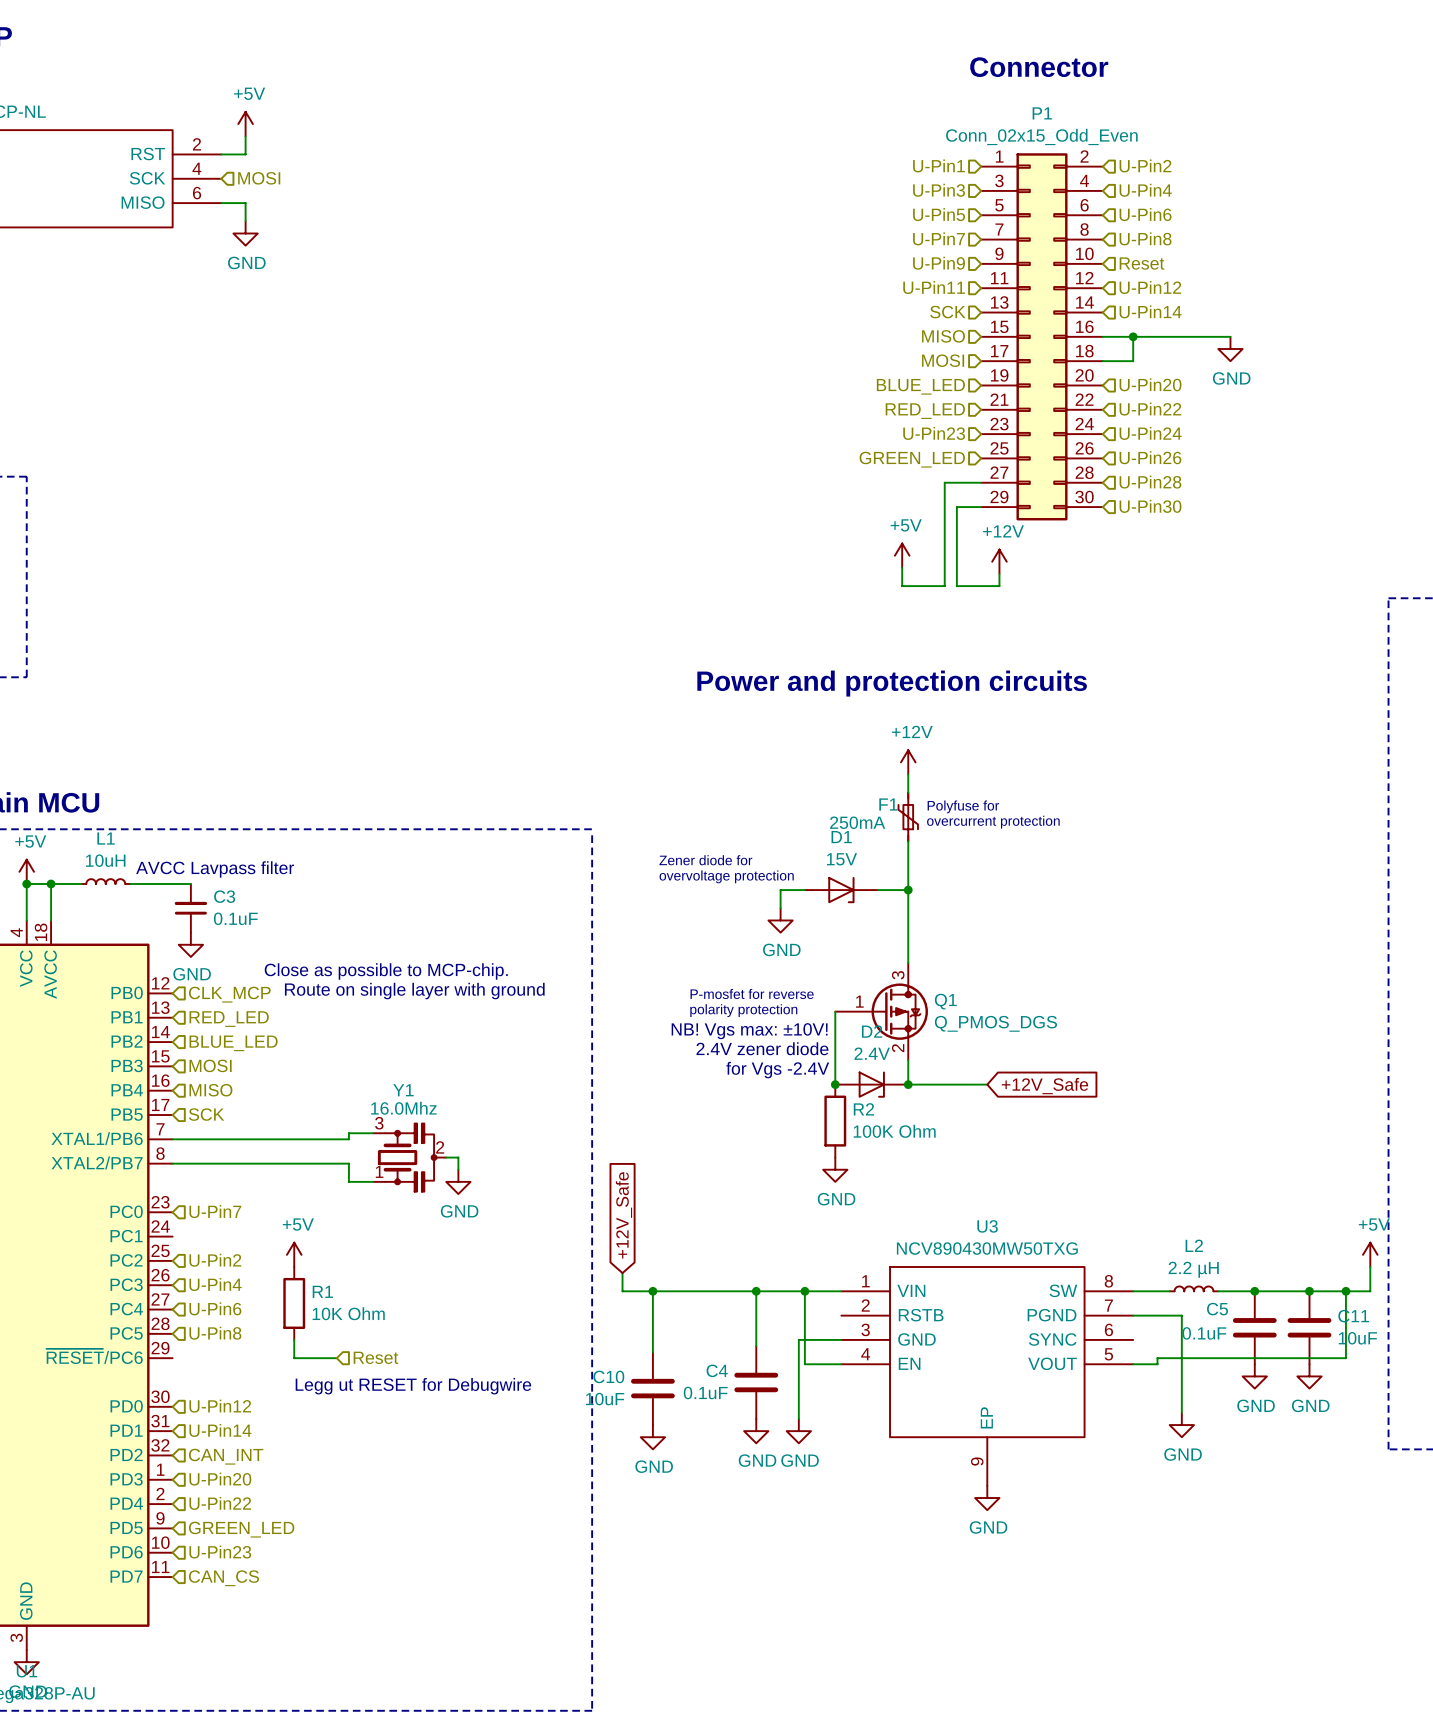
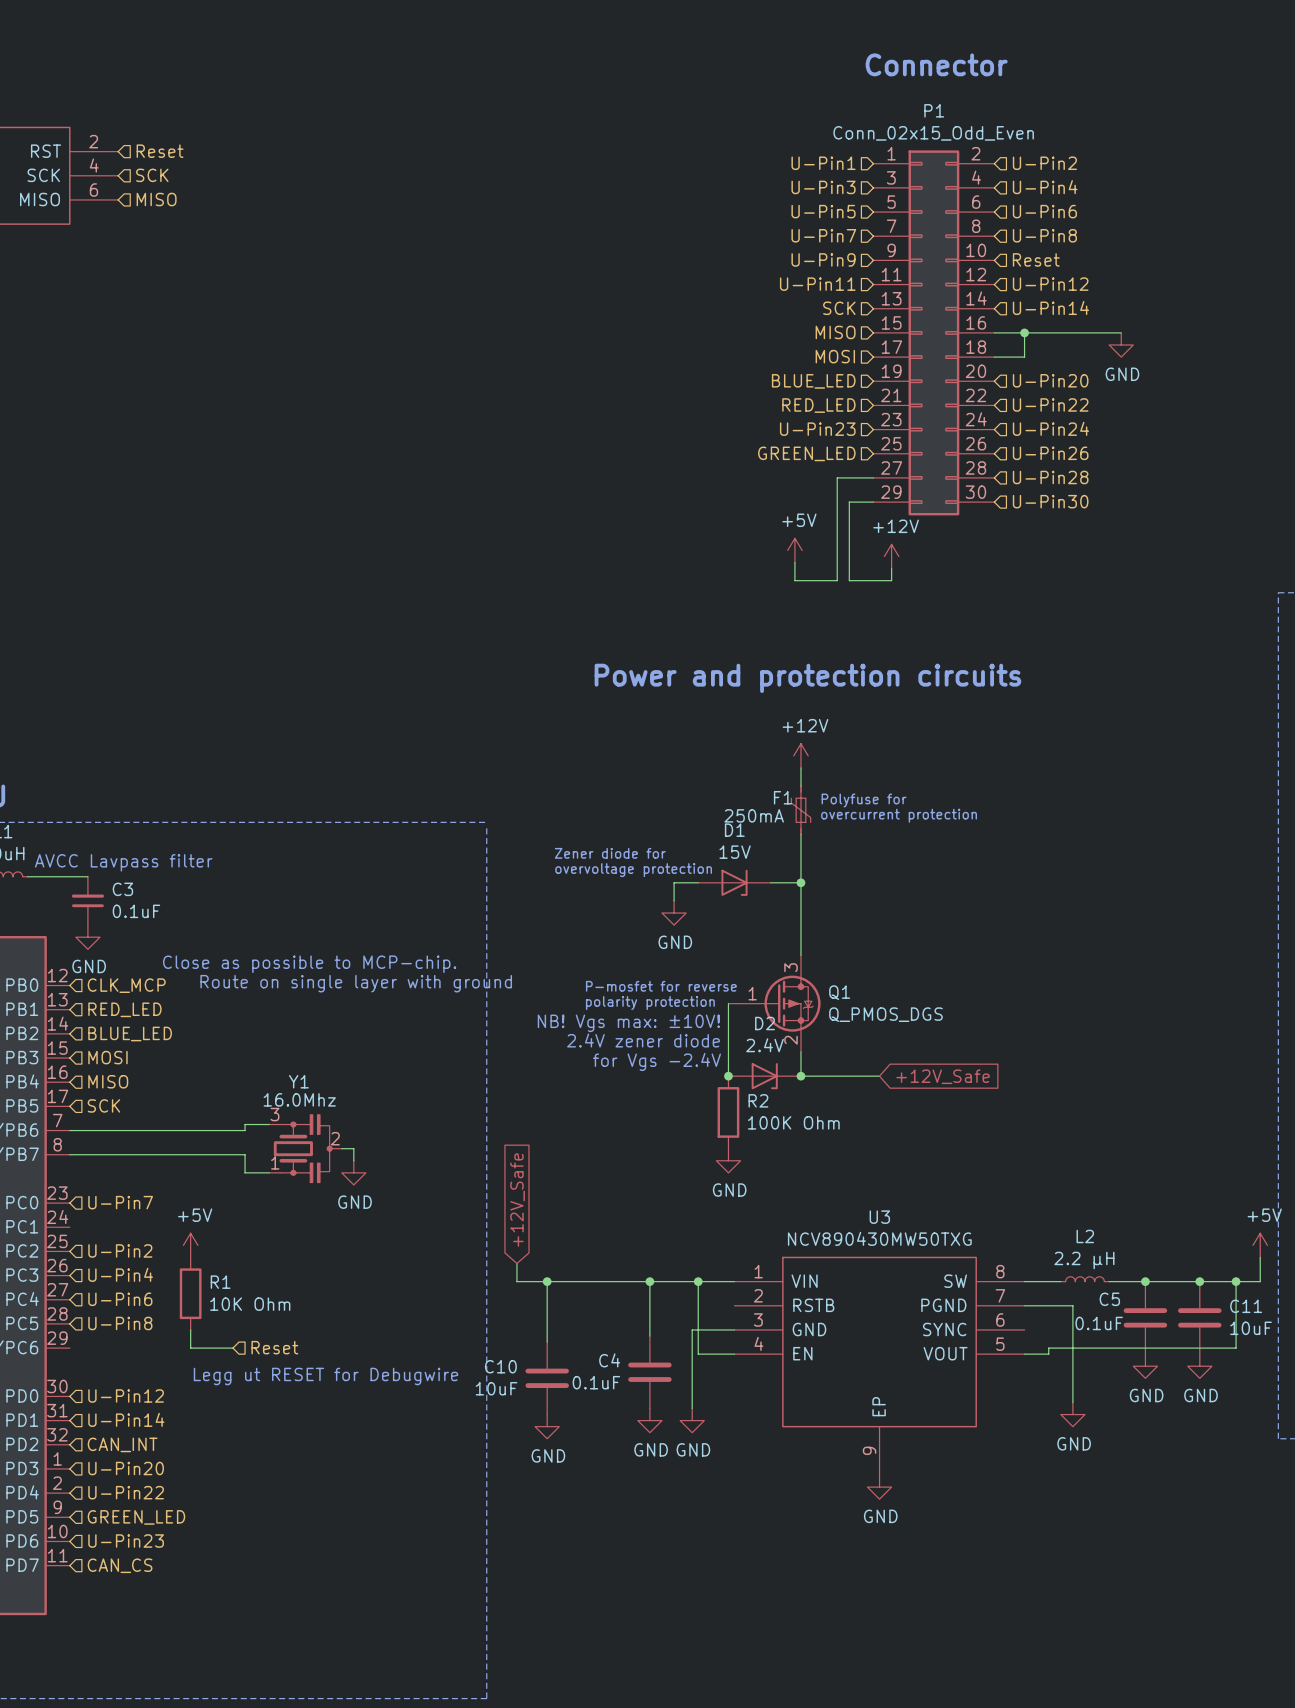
power symbol: +5V (245, 124) -> none
wire: (245, 136) (245, 154) (221, 154) -> none
hierarchical label: none -> Reset (160, 151)
hierarchical label: MOSI (259, 178) -> SCK (152, 175)
hierarchical label: none -> MISO (156, 199)
wire: (221, 203) (245, 203) (245, 221) -> none
power symbol: GND (245, 233) -> none

